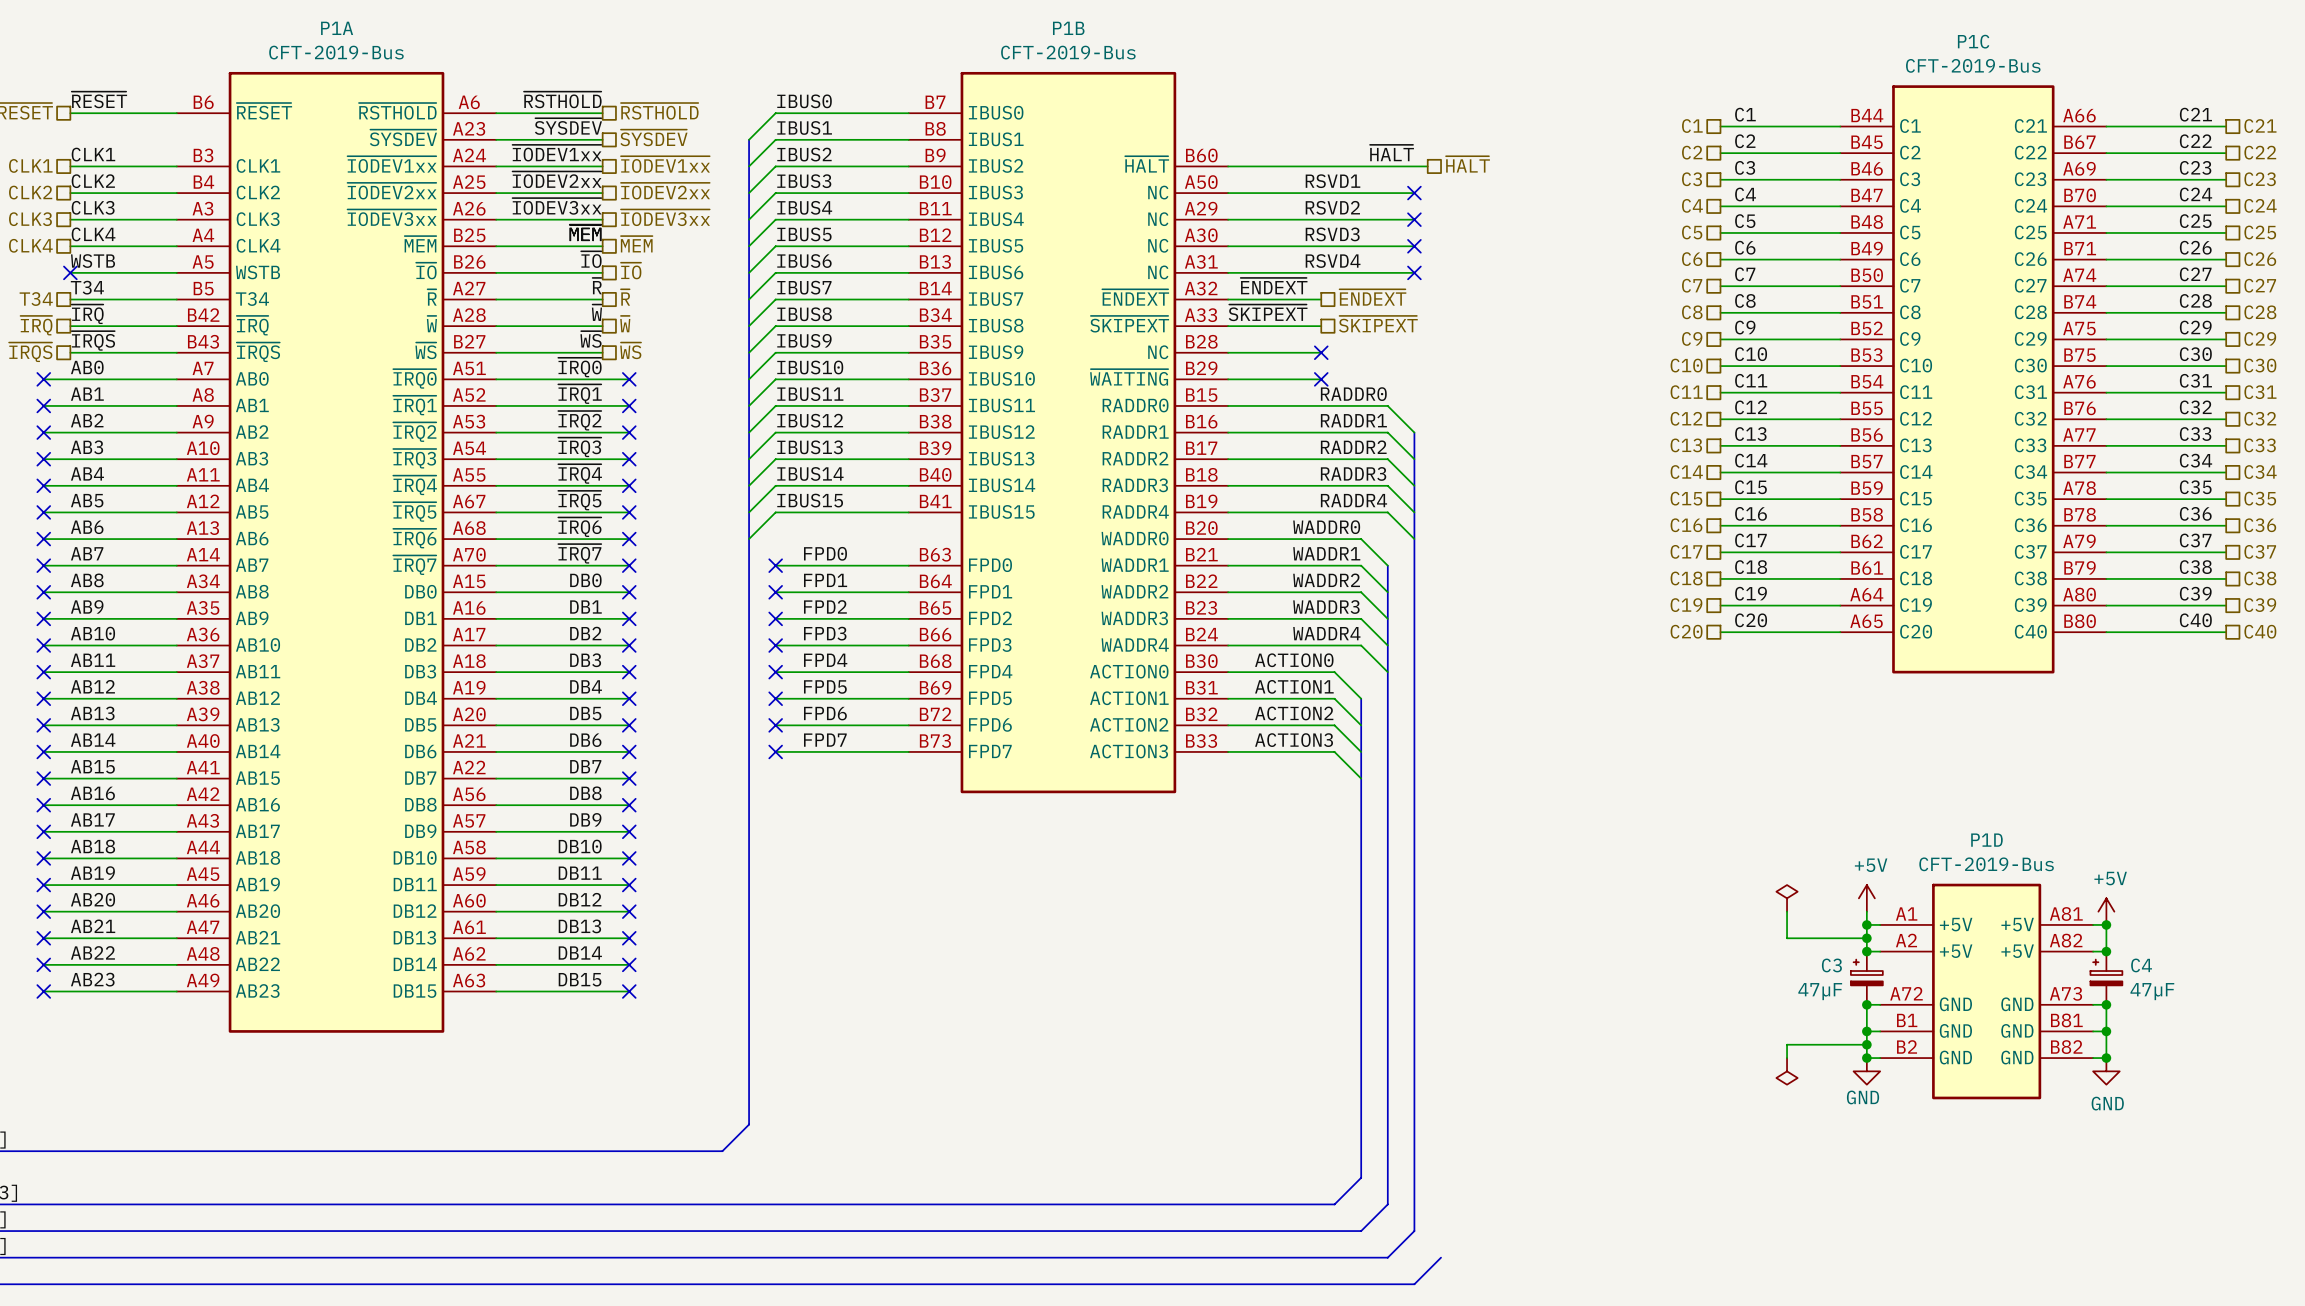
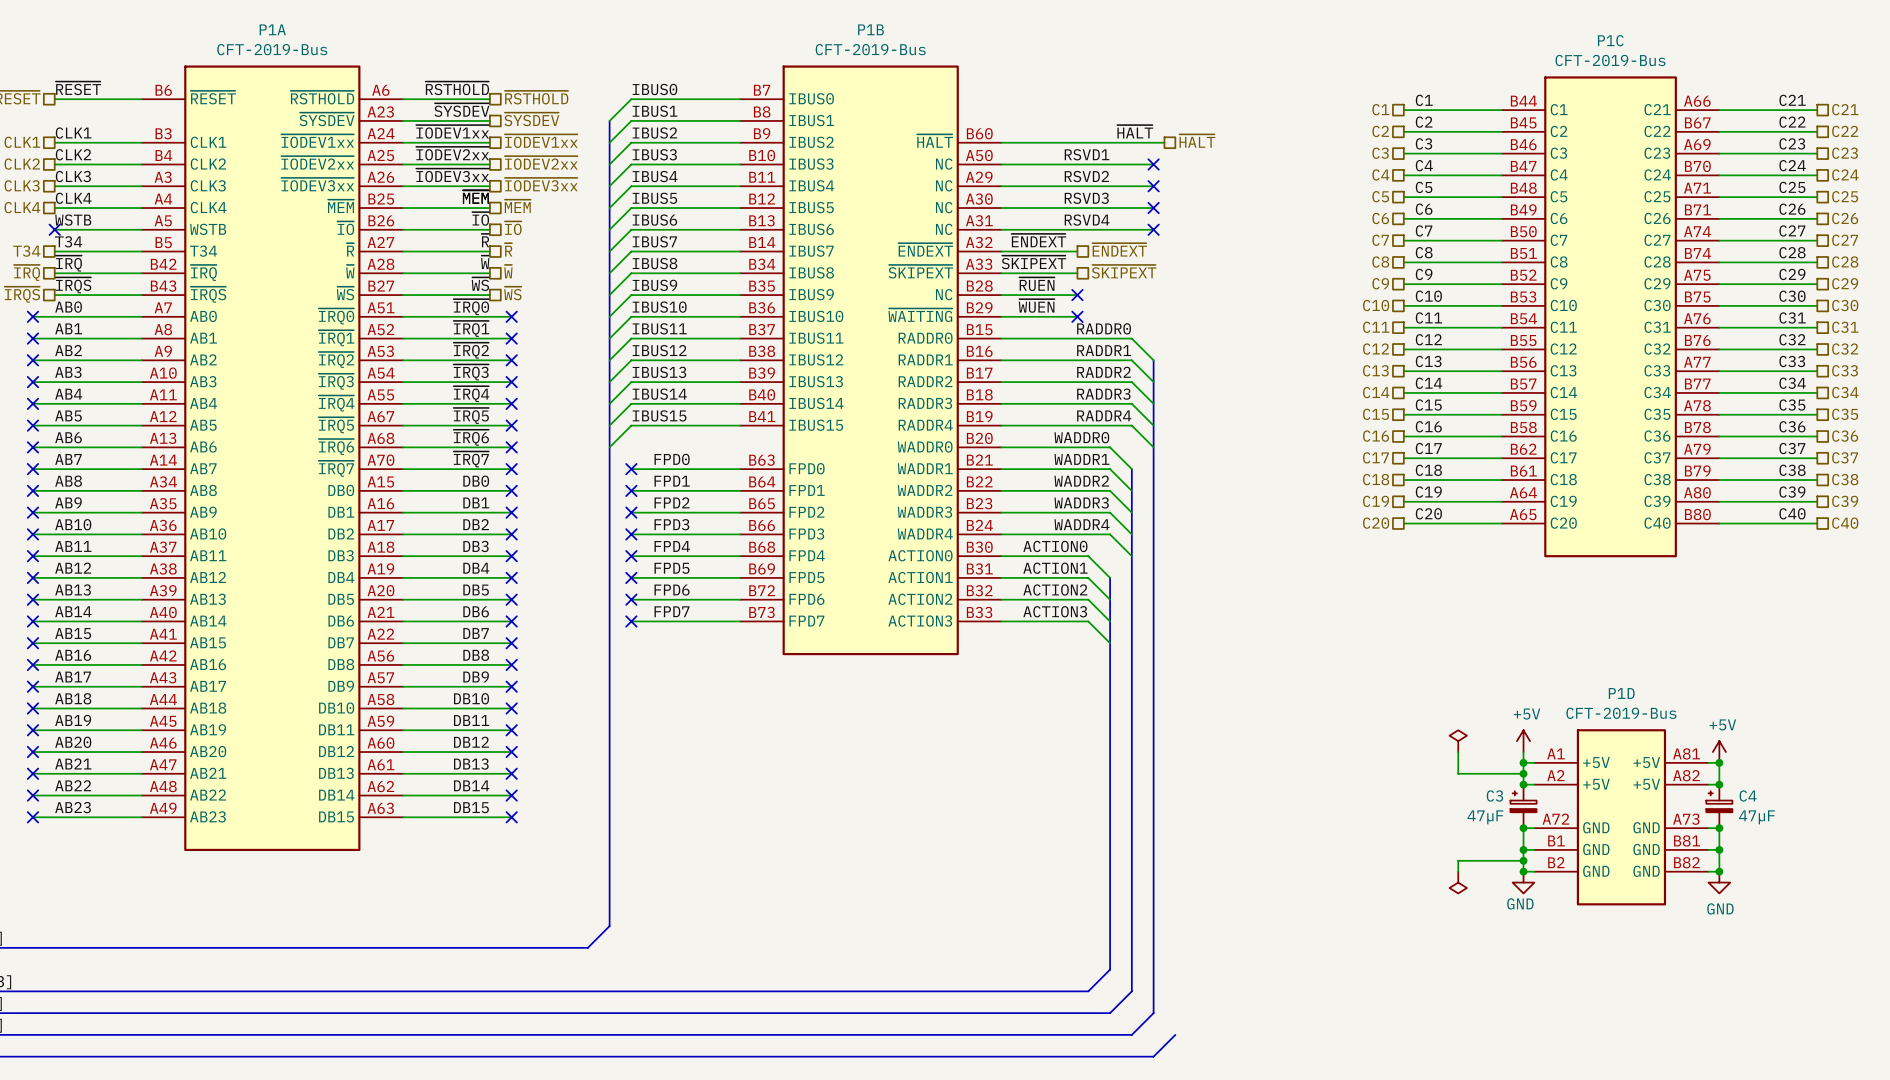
label: none -> ~{RUEN} (1036, 284)
label: none -> ~{WUEN} (1036, 305)

